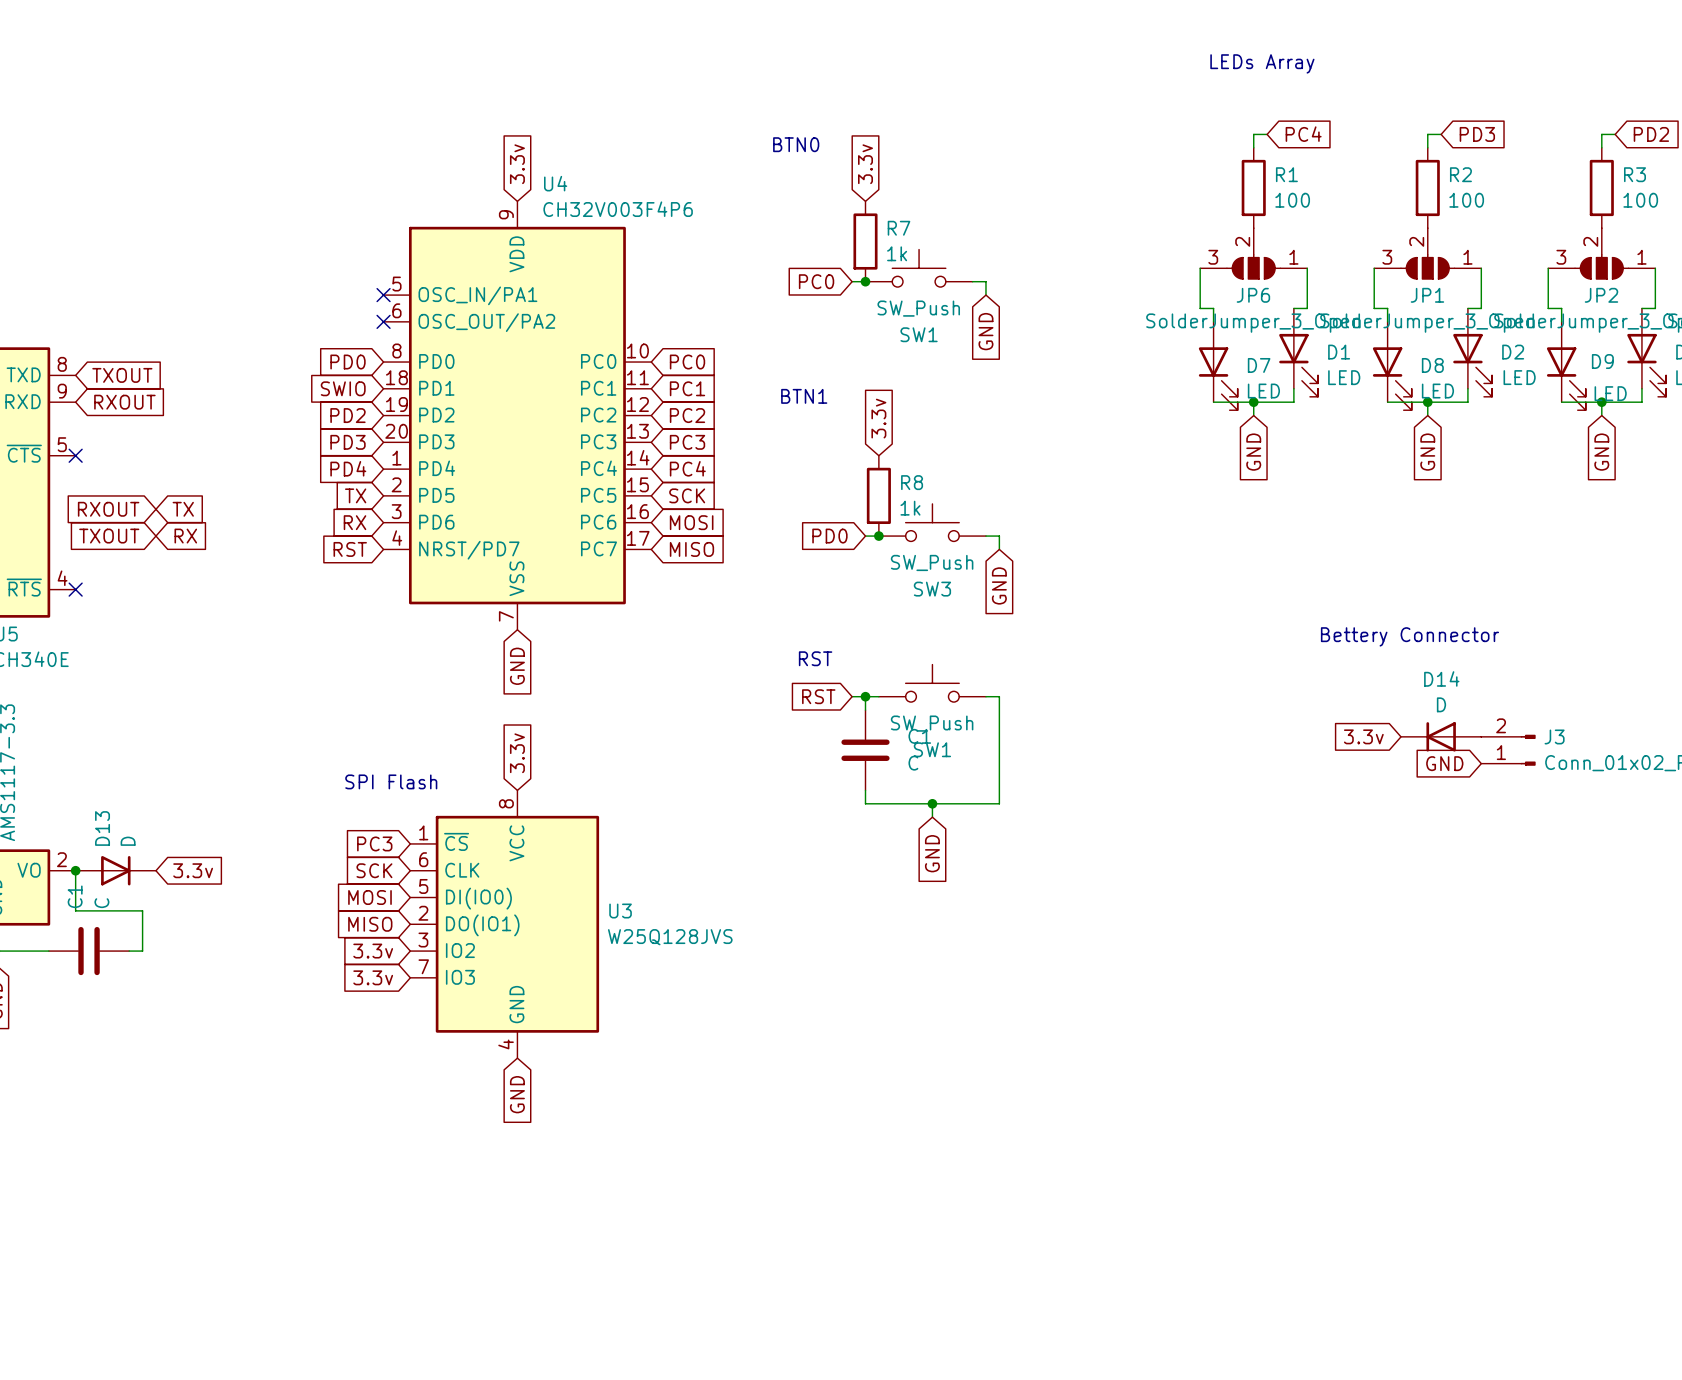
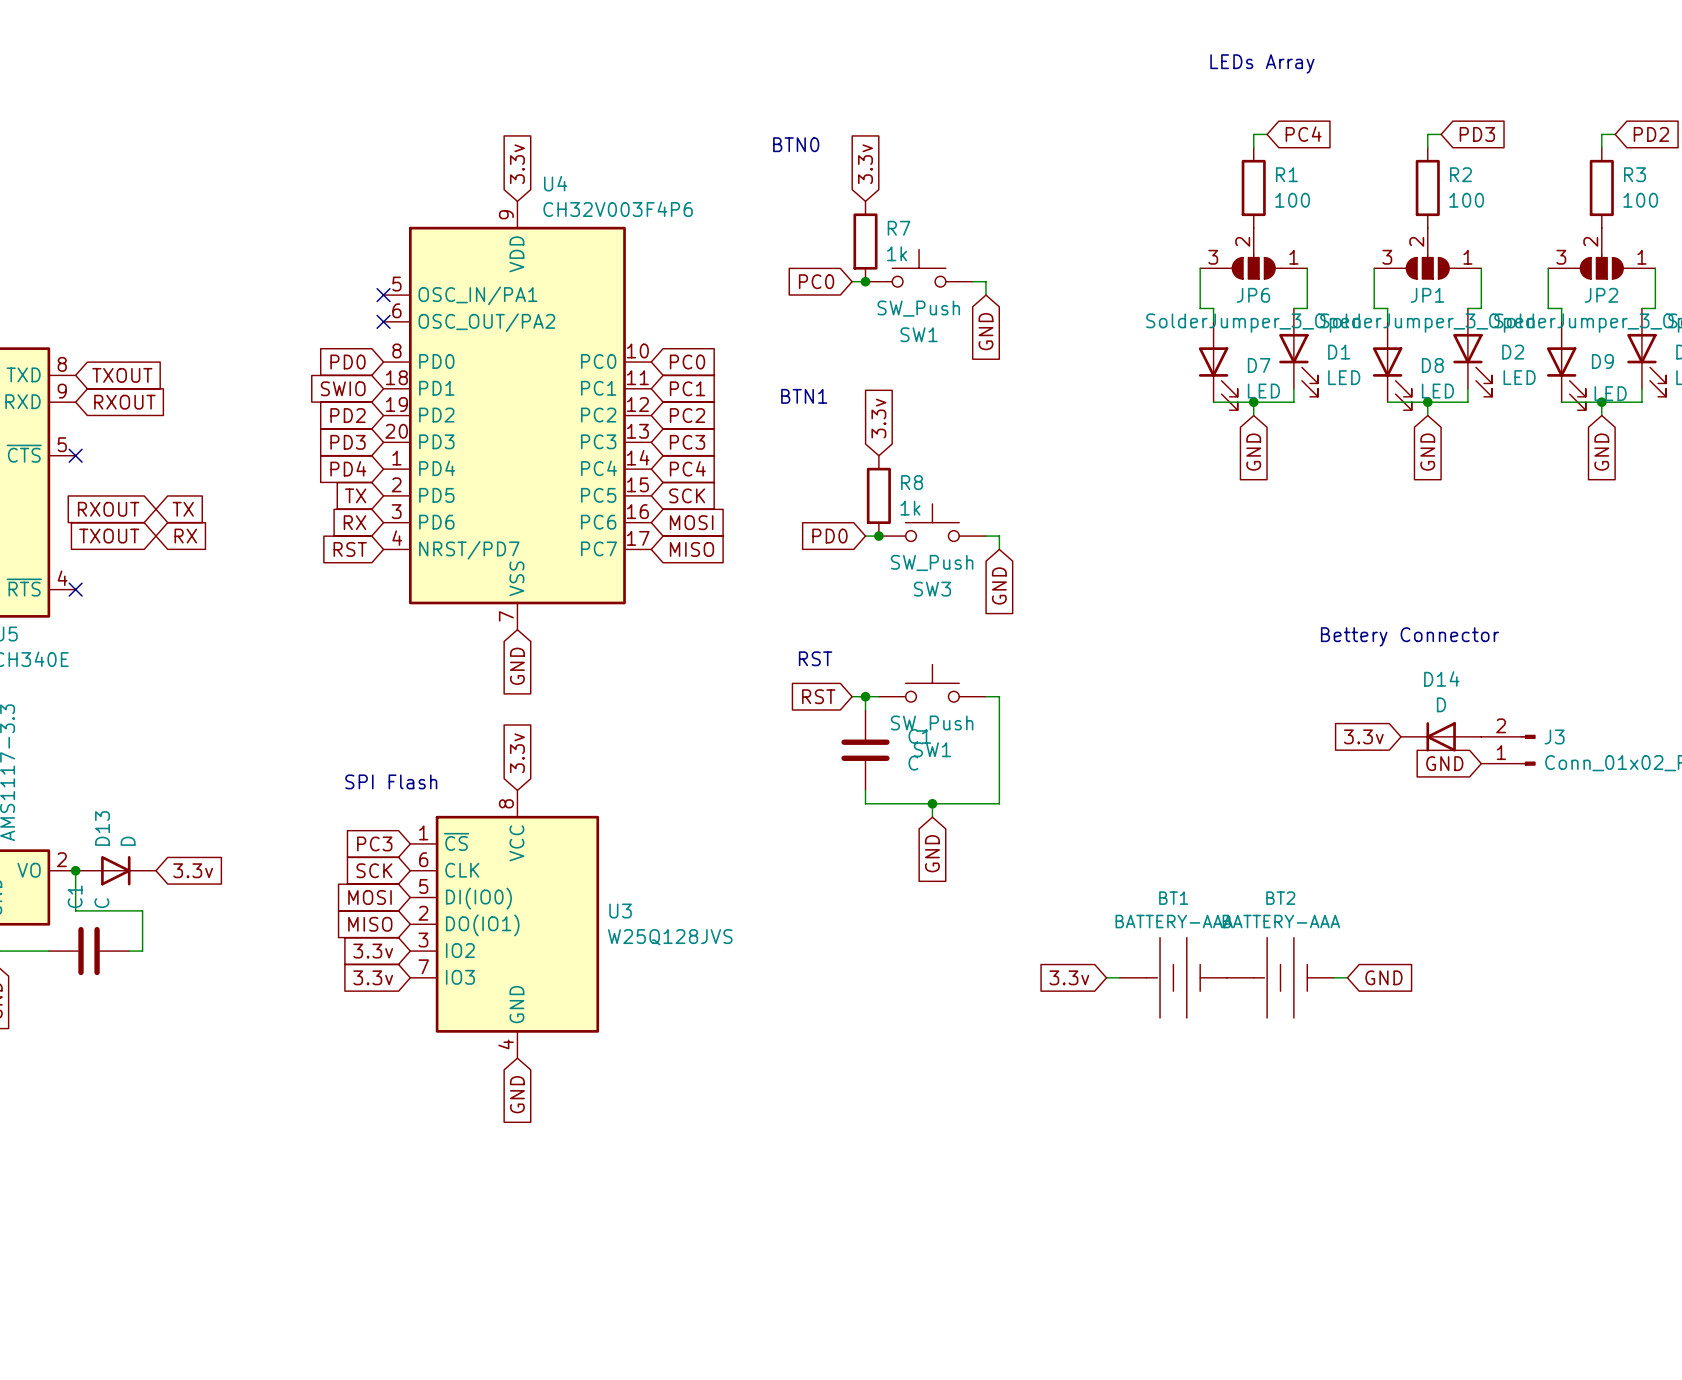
global label: none -> 3.3v (1069, 977)
wire: none -> (1106, 977) (1119, 977)
BT1: none -> BATTERY-AAA (1173, 977)
BT2: none -> BATTERY-AAA (1280, 977)
wire: none -> (1334, 977) (1347, 977)
global label: none -> GND (1383, 977)

